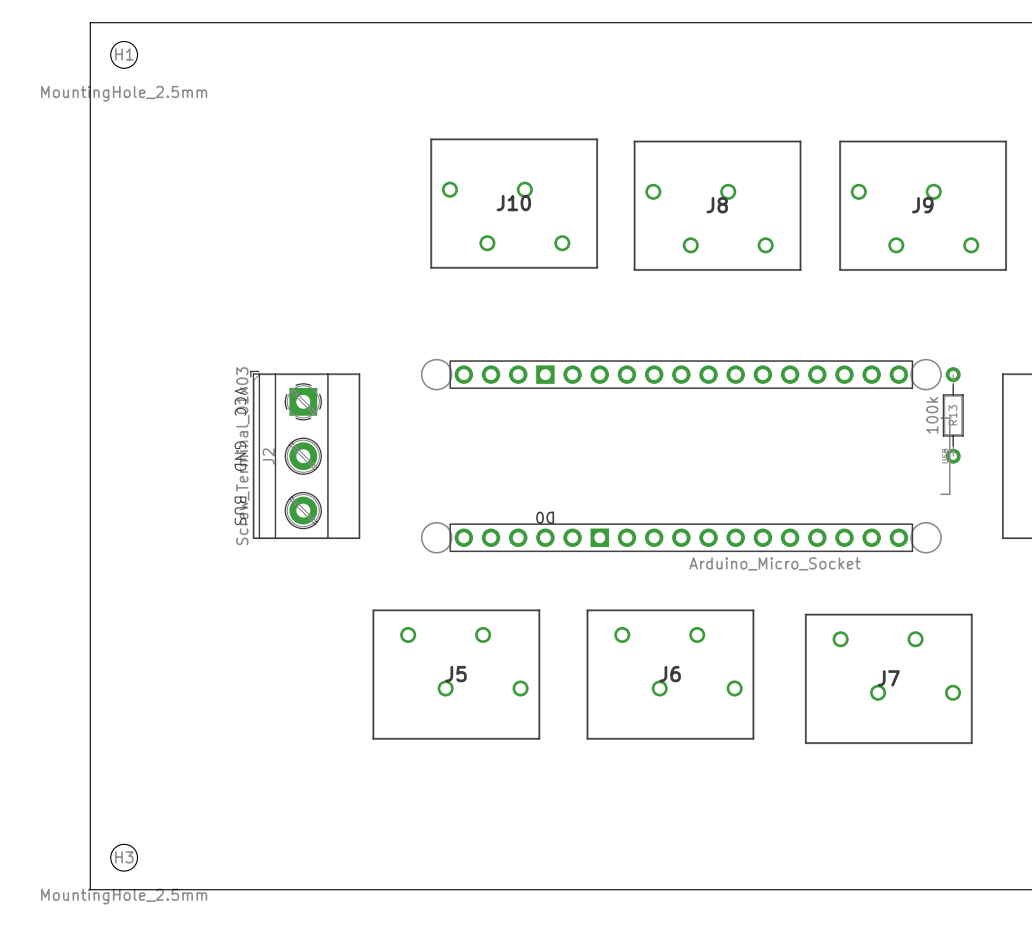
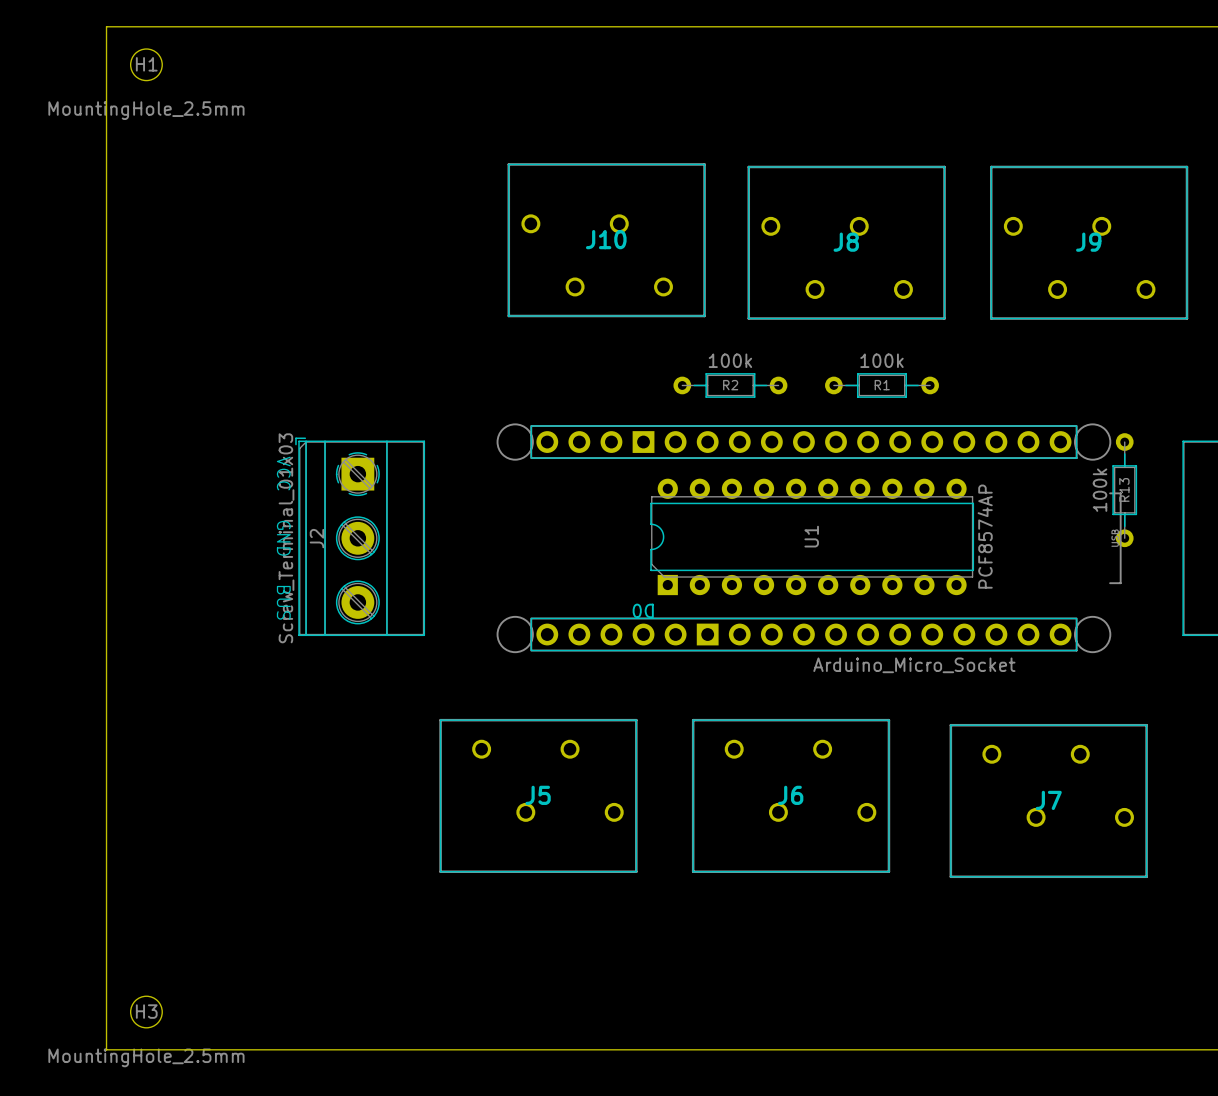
R2: none -> 100k (730, 385)
R1: none -> 100k (881, 385)
U1: none -> PCF8574AP (812, 536)

